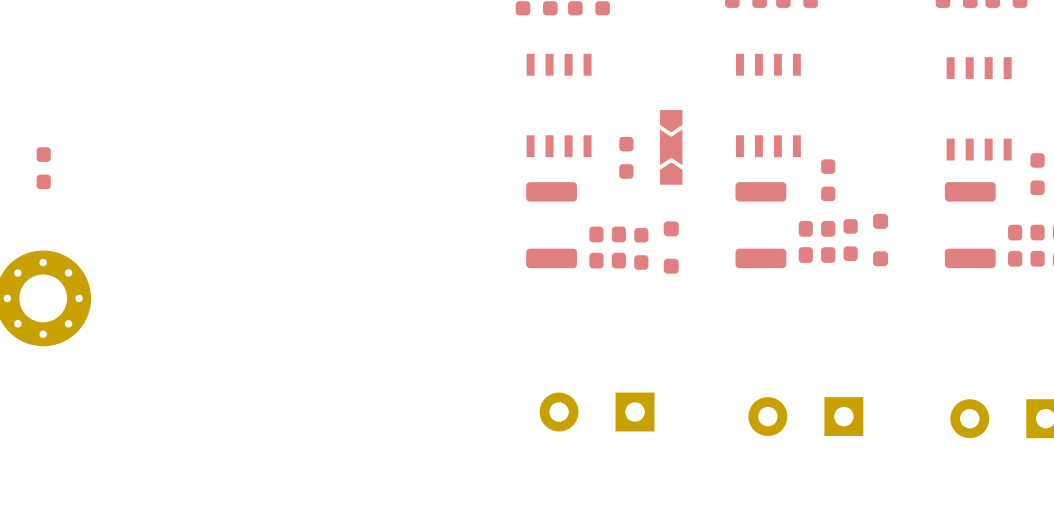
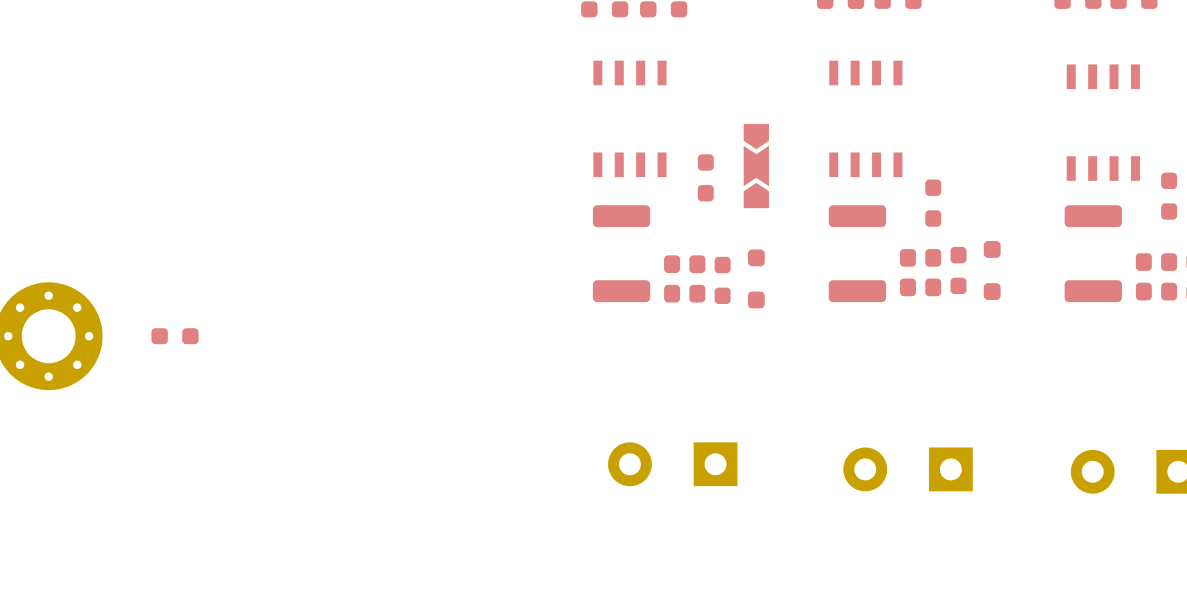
part rotation: 0° (43, 168) -> 90° clockwise (175, 336)
part position: (43, 168) -> (175, 336)

